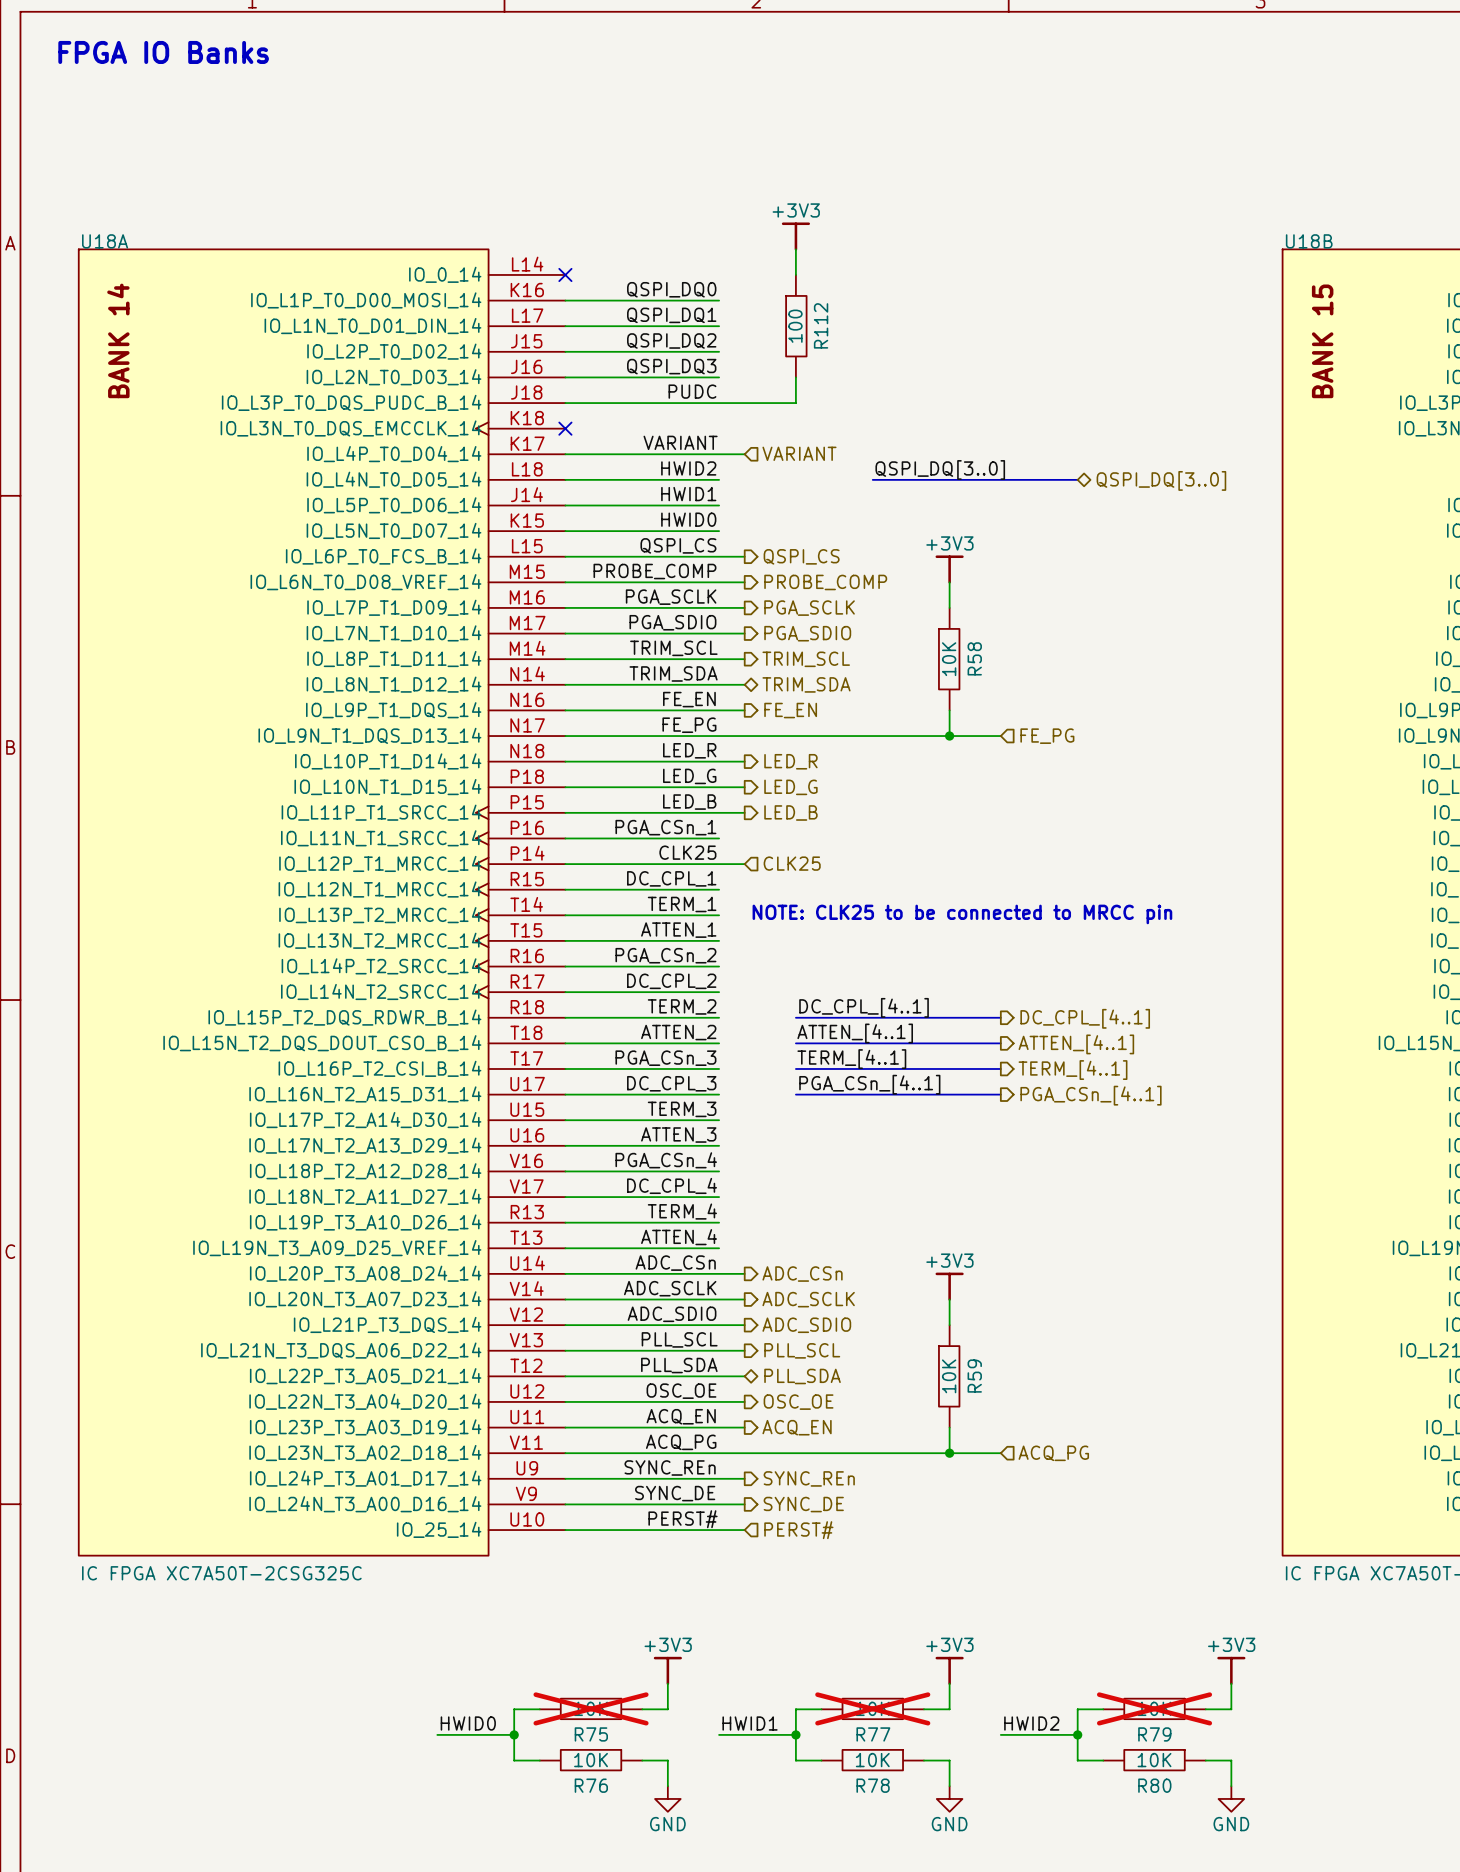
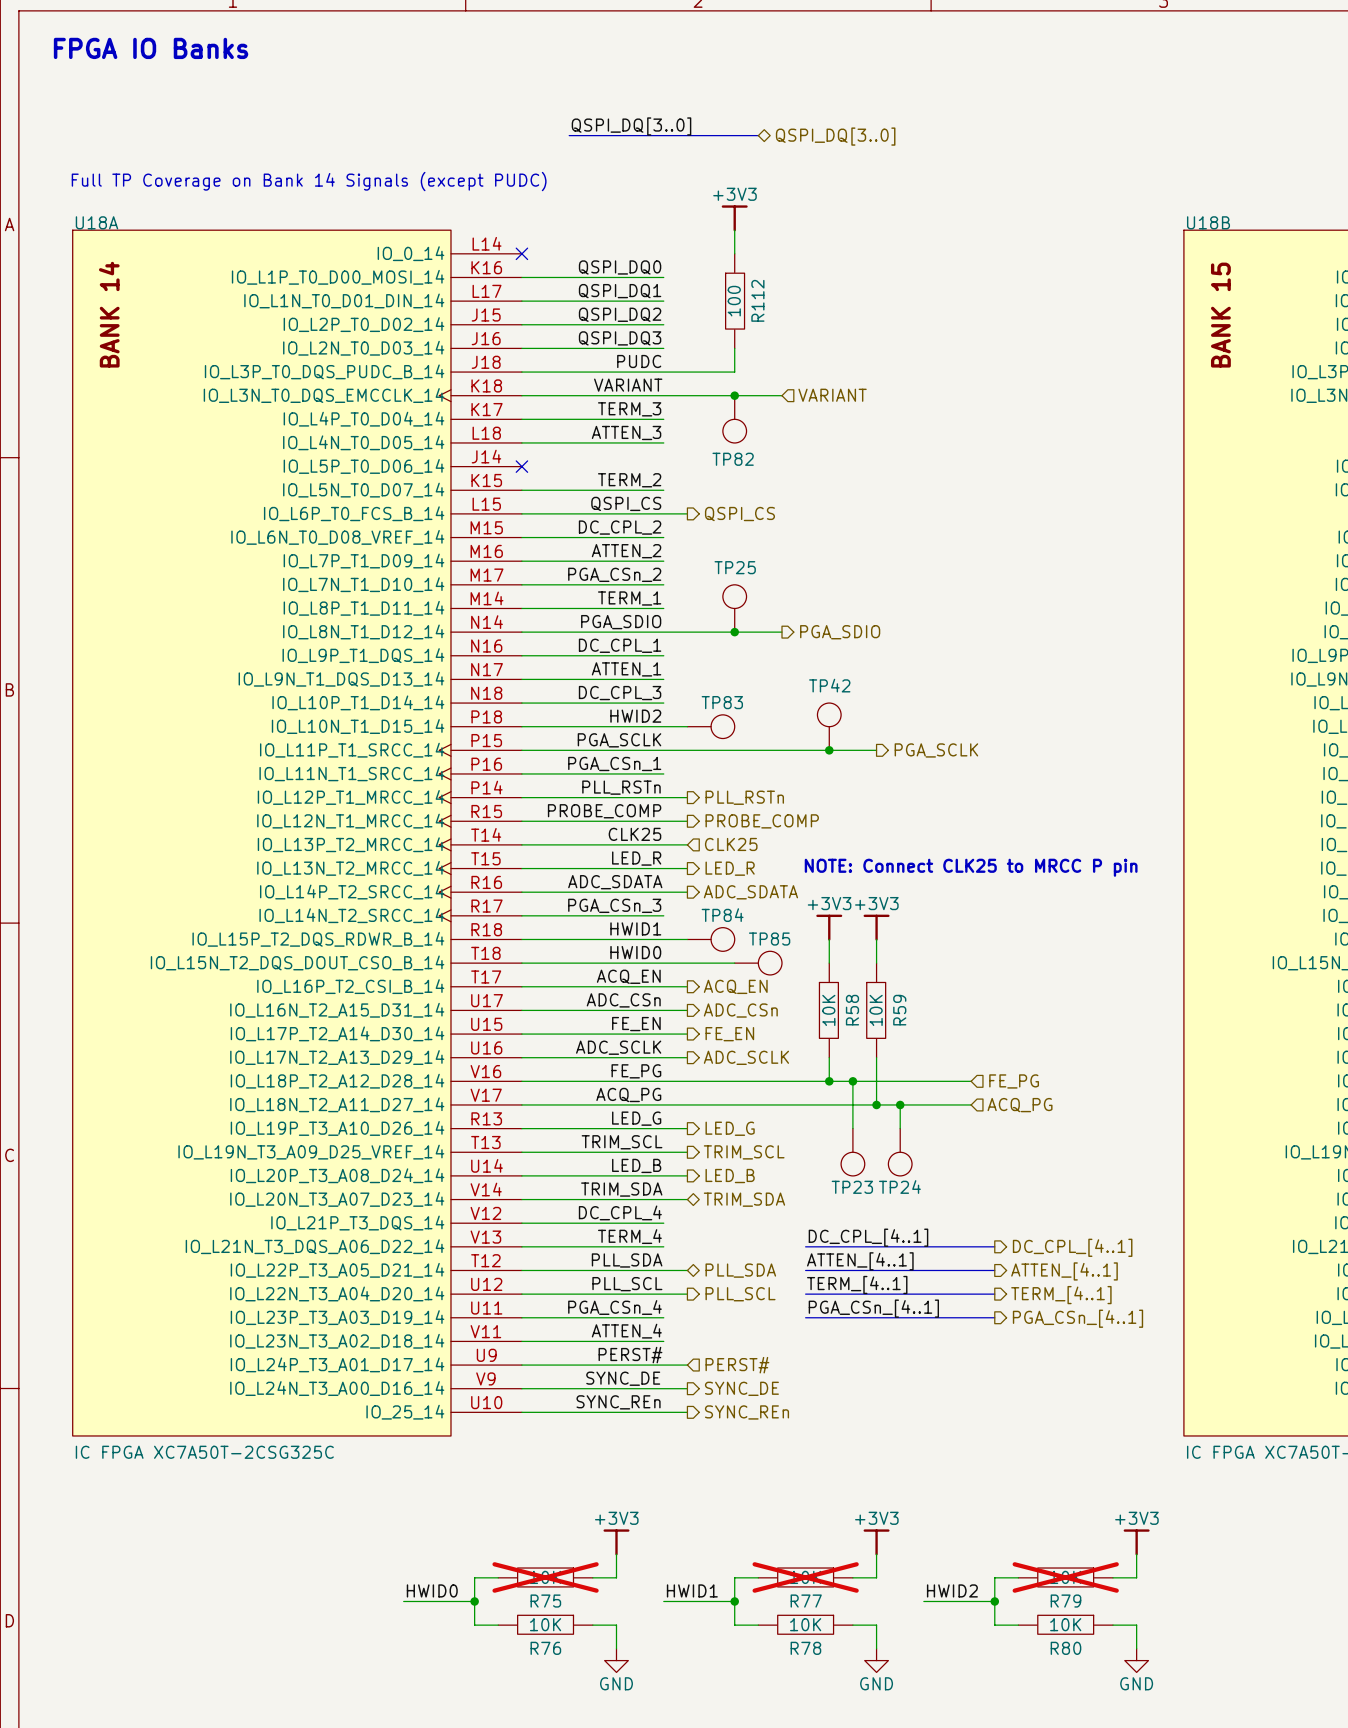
label: none -> QSPI_DQ[3..0] (631, 126)
bus: none -> (569, 135) (758, 135)
hierarchical label: none -> QSPI_DQ[3..0] (835, 136)
text: none -> Full TP Coverage on Bank 14 Signals (except PUDC) (309, 181)
label: none -> VARIANT (628, 385)
wire: none -> (521, 395) (781, 395)
no-connect mark: (565, 428) -> none
junction: none -> (734, 395)
label: VARIANT (680, 442) -> TERM_3 (629, 409)
hierarchical label position: VARIANT (799, 453) -> VARIANT (832, 395)
wire: (719, 454) (744, 454) -> none
TP82: none -> (734, 419)
label: HWID2 (688, 468) -> ATTEN_3 (626, 432)
label: QSPI_DQ[3..0] (940, 469) -> none
bus: (872, 479) (1077, 479) -> none
hierarchical label: QSPI_DQ[3..0] (1161, 480) -> none
label: HWID1 (688, 494) -> none
wire: (565, 505) (719, 505) -> none
no-connect mark: none -> (521, 466)
label: HWID0 (688, 519) -> TERM_2 (629, 480)
power symbol: +3V3 (949, 569) -> none
label: PROBE_COMP (654, 571) -> DC_CPL_2 (620, 527)
wire: (719, 582) (744, 582) -> none
hierarchical label: PROBE_COMP (825, 582) -> none
wire: (949, 582) (949, 607) -> none
label: PGA_SCLK (671, 597) -> ATTEN_2 (626, 551)
wire: (719, 607) (744, 607) -> none
hierarchical label: PGA_SCLK (809, 608) -> none
label: PGA_SDIO (672, 622) -> PGA_CSn_2 (614, 574)
wire: (719, 633) (744, 633) -> none
hierarchical label position: PGA_SDIO (807, 633) -> PGA_SDIO (840, 632)
label: TRIM_SCL (673, 648) -> TERM_1 (629, 598)
wire: (719, 659) (744, 659) -> none
TP25: none -> (734, 608)
hierarchical label: TRIM_SCL (806, 659) -> none
R58 position: (949, 659) -> (828, 1010)
label: TRIM_SDA (673, 673) -> PGA_SDIO (621, 622)
wire: none -> (687, 632) (781, 632)
junction: none -> (734, 632)
hierarchical label: TRIM_SDA (806, 684) -> none
label: FE_EN (689, 699) -> DC_CPL_1 (620, 645)
wire: (719, 710) (744, 710) -> (663, 821) (687, 821)
hierarchical label: FE_EN (790, 710) -> none
wire: (949, 710) (949, 736) -> none
label: FE_PG (689, 725) -> ATTEN_1 (626, 669)
wire: (719, 736) (1000, 736) -> none
junction: (949, 736) -> none
hierarchical label: FE_PG (1047, 736) -> none
label: LED_R (689, 750) -> DC_CPL_3 (620, 693)
wire: (719, 761) (744, 761) -> (663, 868) (687, 868)
hierarchical label position: LED_R (790, 761) -> LED_R (730, 868)
label: LED_G (689, 776) -> HWID2 (635, 716)
TP83: none -> (711, 726)
hierarchical label: LED_G (790, 787) -> none
TP42: none -> (829, 726)
label: LED_B (689, 802) -> PGA_SCLK (619, 740)
wire: none -> (687, 750) (876, 750)
hierarchical label: LED_B (790, 812) -> none
junction: none -> (829, 750)
hierarchical label: none -> PGA_SCLK (936, 750)
label: CLK25 (687, 852) -> PLL_RSTn (621, 787)
hierarchical label shape: input (792, 863) -> output (744, 797)
hierarchical label: CLK25 (792, 863) -> PLL_RSTn (744, 797)
label: DC_CPL_1 (671, 878) -> PROBE_COMP (604, 811)
hierarchical label: none -> PROBE_COMP (762, 821)
label: TERM_1 (682, 904) -> CLK25 (634, 834)
hierarchical label: none -> CLK25 (731, 844)
text: NOTE: CLK25 to be connected to MRCC pin (962, 914) -> NOTE: Connect CLK25 to MRCC P pin (971, 867)
wire: none -> (663, 844) (687, 844)
label: ATTEN_1 (678, 930) -> LED_R (636, 858)
label: PGA_CSn_2 (665, 955) -> ADC_SDATA (615, 882)
wire: none -> (663, 892) (687, 892)
hierarchical label: none -> ADC_SDATA (750, 892)
label: DC_CPL_2 (671, 981) -> PGA_CSn_3 (614, 905)
power symbol: none -> +3V3 (829, 927)
power symbol: none -> +3V3 (876, 927)
label: TERM_2 (682, 1006) -> HWID1 (635, 928)
label: DC_CPL_[4..1] (864, 1007) -> none
wire: none -> (663, 939) (687, 939)
TP84: none -> (711, 939)
bus: (795, 1017) (1000, 1017) -> none
wire: none -> (829, 939) (829, 963)
wire: none -> (876, 939) (876, 963)
hierarchical label: DC_CPL_[4..1] (1085, 1018) -> none
label: ATTEN_2 (678, 1032) -> HWID0 (635, 952)
label: ATTEN_[4..1] (855, 1033) -> none
wire: none -> (663, 963) (734, 963)
bus: (795, 1043) (1000, 1043) -> none
TP85: none -> (758, 963)
hierarchical label: ATTEN_[4..1] (1076, 1044) -> none
label: PGA_CSn_3 (665, 1058) -> ACQ_EN (628, 976)
label: TERM_[4..1] (851, 1059) -> none
wire: none -> (663, 986) (687, 986)
bus: (795, 1068) (1000, 1068) -> none
hierarchical label: none -> ACQ_EN (735, 986)
hierarchical label: TERM_[4..1] (1073, 1070) -> none
label: DC_CPL_3 (671, 1083) -> ADC_CSn (623, 1000)
label: PGA_CSn_[4..1] (869, 1084) -> none
wire: none -> (663, 1010) (687, 1010)
bus: (795, 1094) (1000, 1094) -> none
hierarchical label: none -> ADC_CSn (740, 1010)
hierarchical label: PGA_CSn_[4..1] (1090, 1095) -> none
label: TERM_3 (682, 1109) -> FE_EN (636, 1024)
hierarchical label: none -> FE_EN (729, 1034)
label: ATTEN_3 (678, 1135) -> ADC_SCLK (618, 1047)
hierarchical label: none -> ADC_SCLK (746, 1057)
wire: none -> (829, 1057) (829, 1081)
wire: none -> (876, 1057) (876, 1104)
label: PGA_CSn_4 (666, 1160) -> FE_PG (636, 1071)
wire: none -> (663, 1081) (971, 1081)
junction: none -> (829, 1081)
wire: none -> (852, 1081) (852, 1128)
junction: none -> (852, 1081)
hierarchical label: none -> FE_PG (1014, 1081)
label: DC_CPL_4 (672, 1185) -> ACQ_PG (628, 1094)
wire: none -> (663, 1104) (971, 1104)
junction: none -> (876, 1104)
junction: none -> (900, 1104)
hierarchical label: none -> ACQ_PG (1020, 1105)
label: TERM_4 (682, 1211) -> LED_G (636, 1118)
hierarchical label: none -> LED_G (730, 1128)
label: ATTEN_4 (679, 1237) -> TRIM_SCL (622, 1142)
wire: none -> (663, 1152) (687, 1152)
hierarchical label: none -> TRIM_SCL (744, 1152)
TP23: none -> (852, 1152)
TP24: none -> (900, 1152)
label: ADC_CSn (675, 1263) -> LED_B (636, 1165)
hierarchical label: ADC_CSn (802, 1274) -> LED_B (730, 1176)
power symbol: +3V3 (949, 1286) -> none
label: ADC_SCLK (670, 1288) -> TRIM_SDA (621, 1189)
hierarchical label shape: output (808, 1299) -> bidirectional (744, 1199)
hierarchical label: ADC_SCLK (808, 1299) -> TRIM_SDA (744, 1199)
wire: (949, 1299) (949, 1325) -> (900, 1104) (900, 1128)
label: ADC_SDIO (672, 1314) -> DC_CPL_4 (620, 1212)
wire: (719, 1325) (744, 1325) -> (663, 1034) (687, 1034)
hierarchical label: ADC_SDIO (806, 1325) -> none
label: PLL_SCL (679, 1339) -> TERM_4 (629, 1236)
label: none -> DC_CPL_[4..1] (868, 1237)
wire: (719, 1350) (744, 1350) -> (663, 1057) (687, 1057)
hierarchical label: PLL_SCL (802, 1350) -> none
bus: none -> (805, 1246) (994, 1246)
hierarchical label: none -> DC_CPL_[4..1] (1072, 1247)
label: none -> ATTEN_[4..1] (860, 1261)
bus: none -> (805, 1270) (994, 1270)
R59 position: (949, 1376) -> (876, 1010)
hierarchical label: none -> ATTEN_[4..1] (1064, 1271)
label: OSC_OE (681, 1391) -> PLL_SCL (627, 1284)
label: none -> TERM_[4..1] (857, 1284)
bus: none -> (805, 1294) (994, 1294)
hierarchical label: OSC_OE (798, 1402) -> PLL_SCL (740, 1294)
hierarchical label: none -> TERM_[4..1] (1061, 1295)
label: ACQ_EN (681, 1416) -> PGA_CSn_4 (614, 1307)
label: none -> PGA_CSn_[4..1] (873, 1308)
wire: (719, 1427) (744, 1427) -> (663, 1128) (687, 1128)
hierarchical label: ACQ_EN (797, 1427) -> none
bus: none -> (805, 1317) (994, 1317)
wire: (949, 1427) (949, 1453) -> none
hierarchical label: none -> PGA_CSn_[4..1] (1078, 1318)
label: ACQ_PG (681, 1442) -> ATTEN_4 (626, 1331)
wire: (719, 1453) (1000, 1453) -> none
junction: (949, 1453) -> none
hierarchical label: ACQ_PG (1053, 1453) -> none
label: SYNC_REn (670, 1467) -> PERST# (630, 1355)
hierarchical label shape: output (809, 1478) -> input (737, 1365)
hierarchical label: SYNC_REn (809, 1478) -> PERST# (737, 1365)
label: PERST# (683, 1519) -> SYNC_REn (618, 1402)
hierarchical label shape: input (798, 1530) -> output (746, 1412)
hierarchical label: PERST# (798, 1530) -> SYNC_REn (746, 1412)

